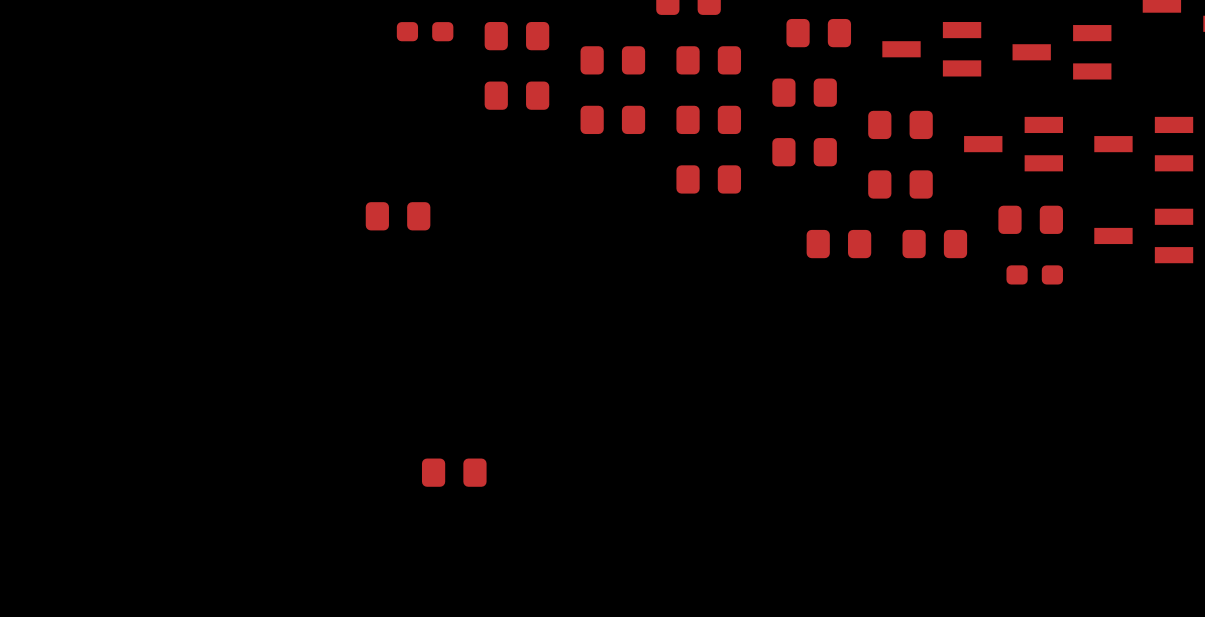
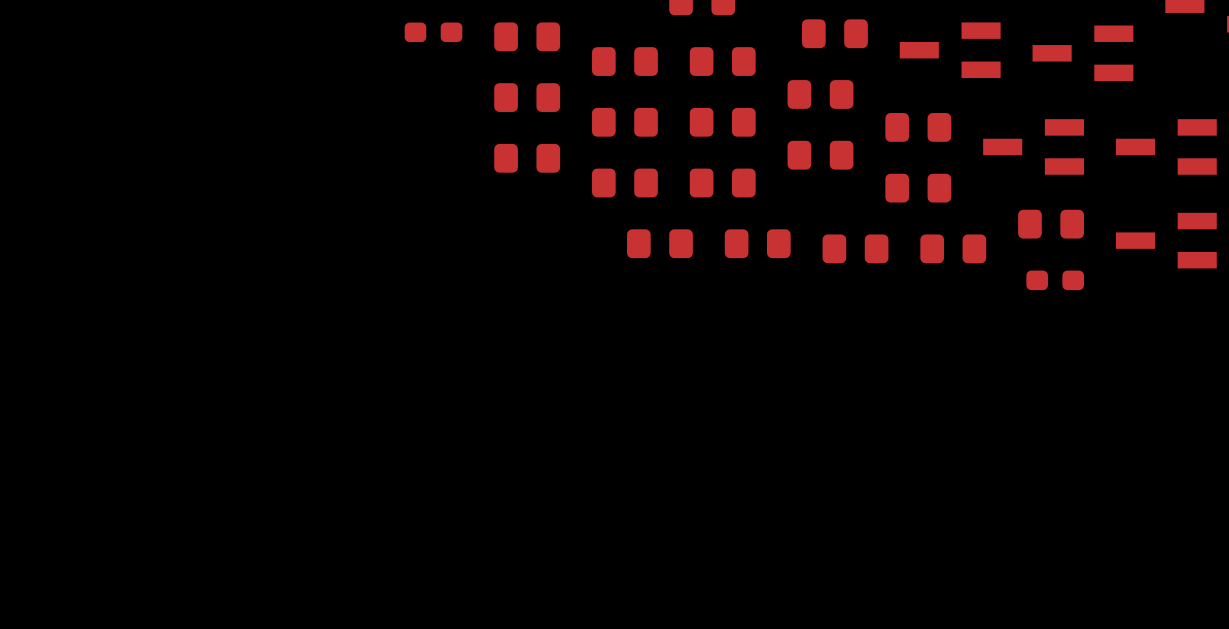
part: none -> (527, 158)
part: none -> (624, 182)
part: (398, 216) -> none
part: none -> (659, 243)
part: none -> (757, 243)
part: (454, 472) -> none

